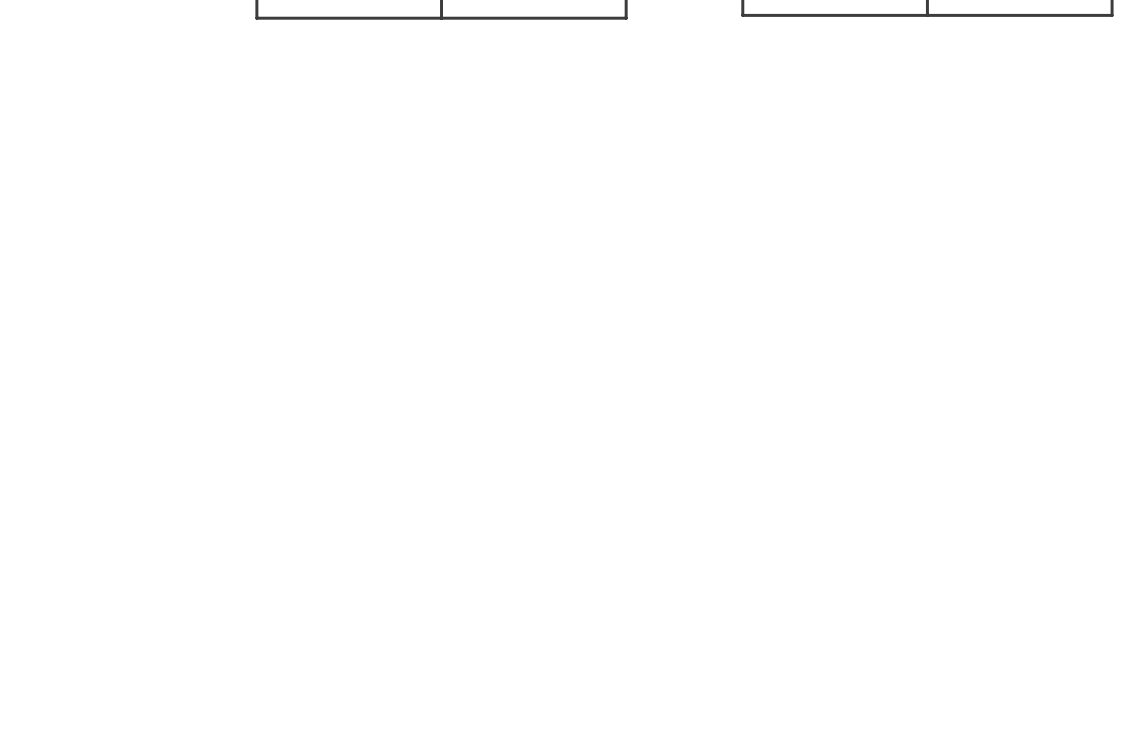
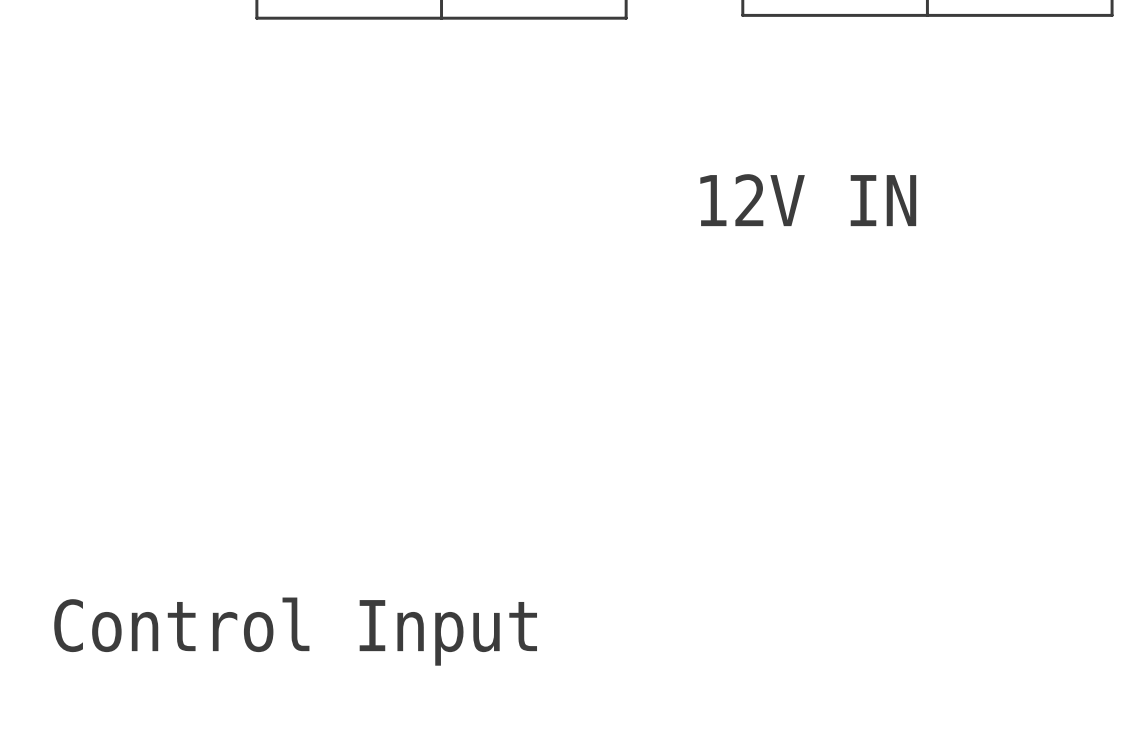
text: none -> 12V IN (808, 200)
text: none -> Control Input (295, 631)

